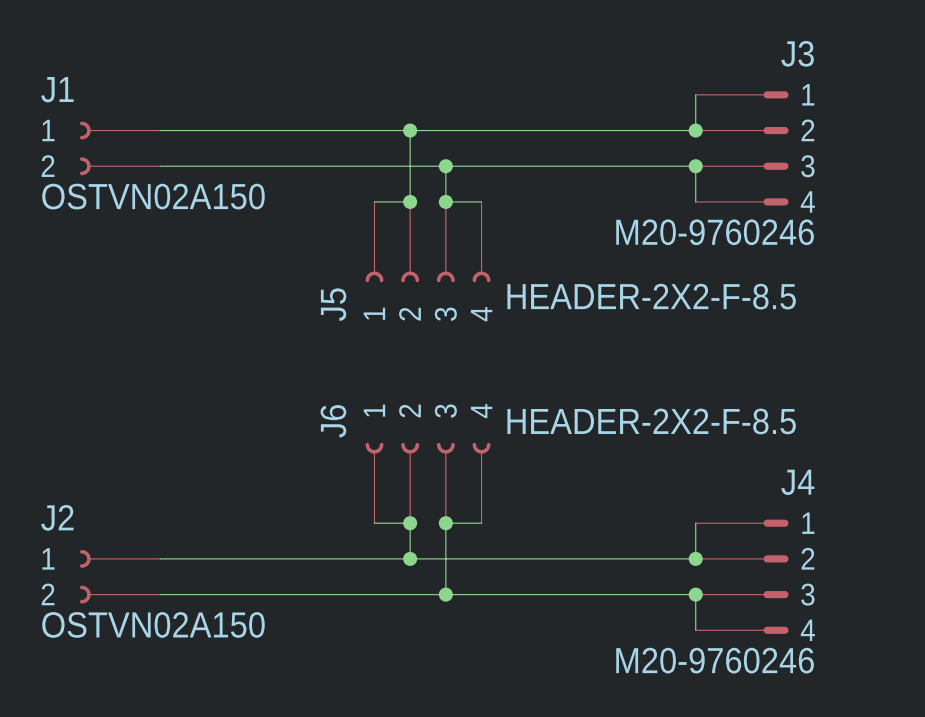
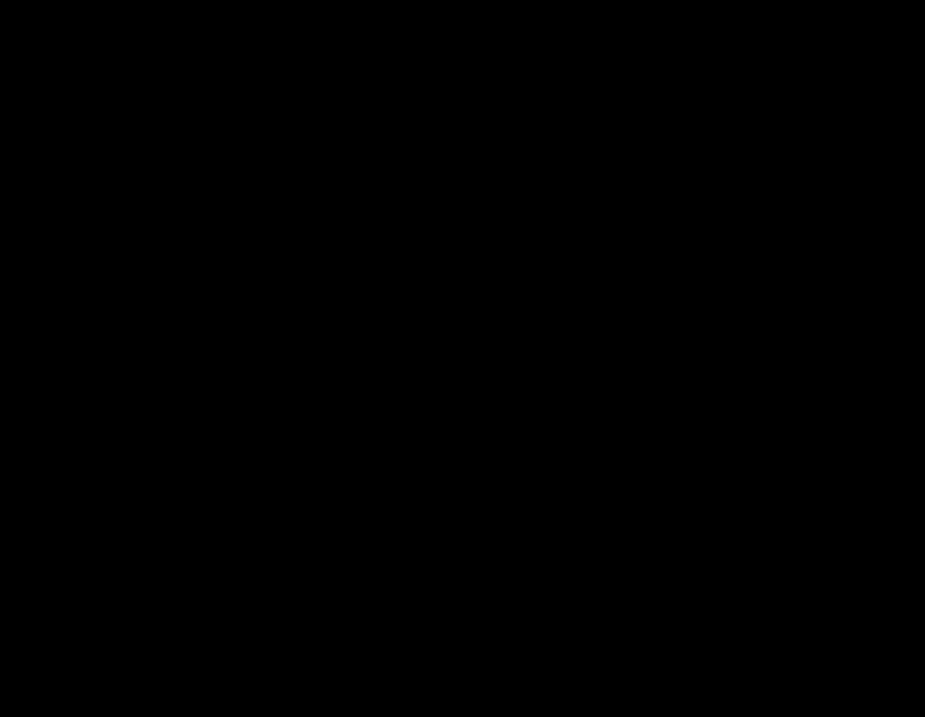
wire: (695, 94) (695, 130) (160, 130) -> none
wire: (410, 130) (410, 201) (374, 201) -> none
junction: (410, 130) -> none
junction: (695, 130) -> none
J1: OSTVN02A150 (120, 148) -> none
J3: M20-9760246 (742, 148) -> none
wire: (160, 166) (695, 166) (695, 201) -> none
wire: (445, 166) (445, 201) (481, 201) -> none
junction: (445, 166) -> none
junction: (695, 166) -> none
junction: (410, 201) -> none
junction: (445, 201) -> none
J5: HEADER-2X2-F-8.5 (428, 242) -> none
J6: HEADER-2X2-F-8.5 (428, 483) -> none
wire: (374, 523) (410, 523) (410, 558) -> none
junction: (410, 523) -> none
junction: (445, 523) -> none
wire: (481, 523) (445, 523) (445, 594) -> none
wire: (695, 523) (695, 558) (160, 558) -> none
junction: (410, 558) -> none
junction: (695, 558) -> none
J2: OSTVN02A150 (120, 576) -> none
J4: M20-9760246 (742, 576) -> none
wire: (160, 594) (695, 594) (695, 630) -> none
junction: (445, 594) -> none
junction: (695, 594) -> none

